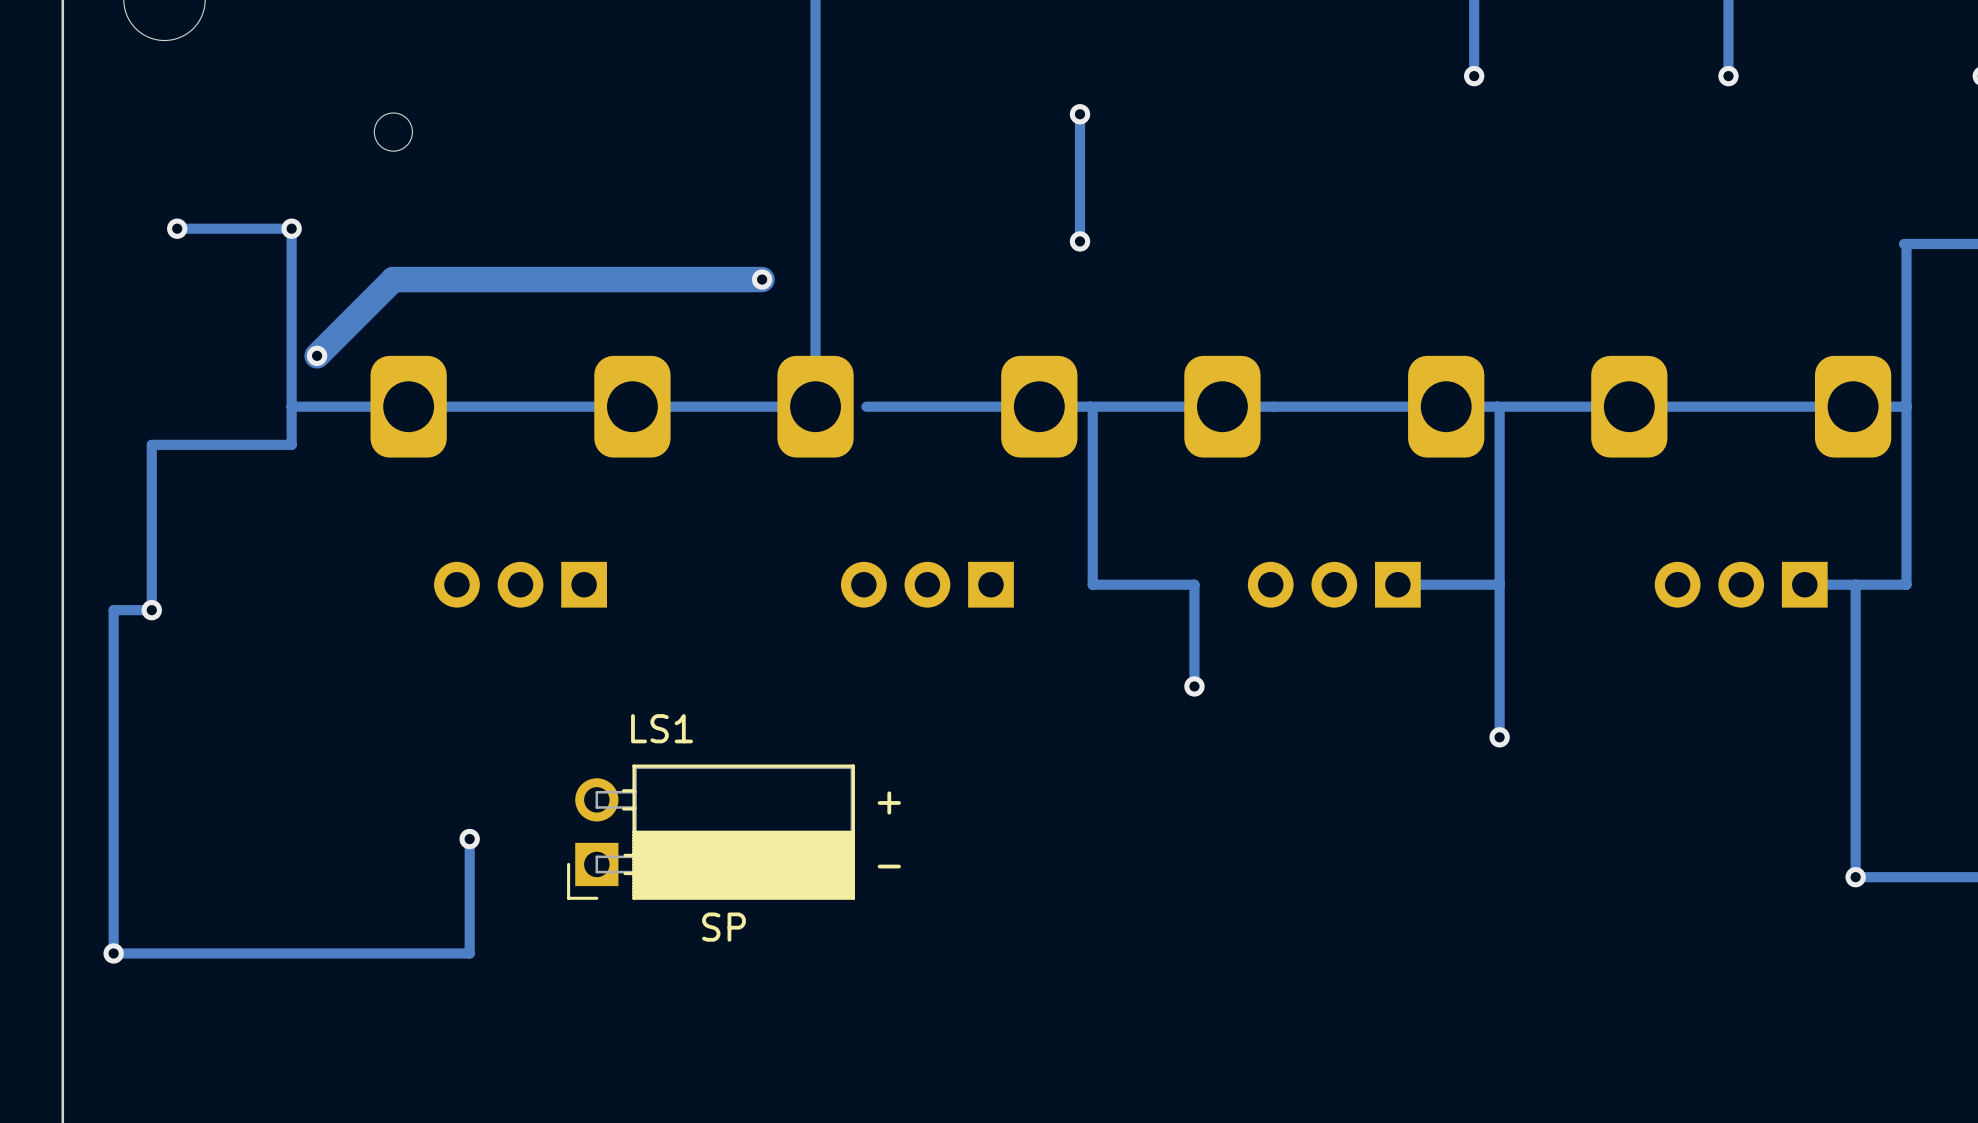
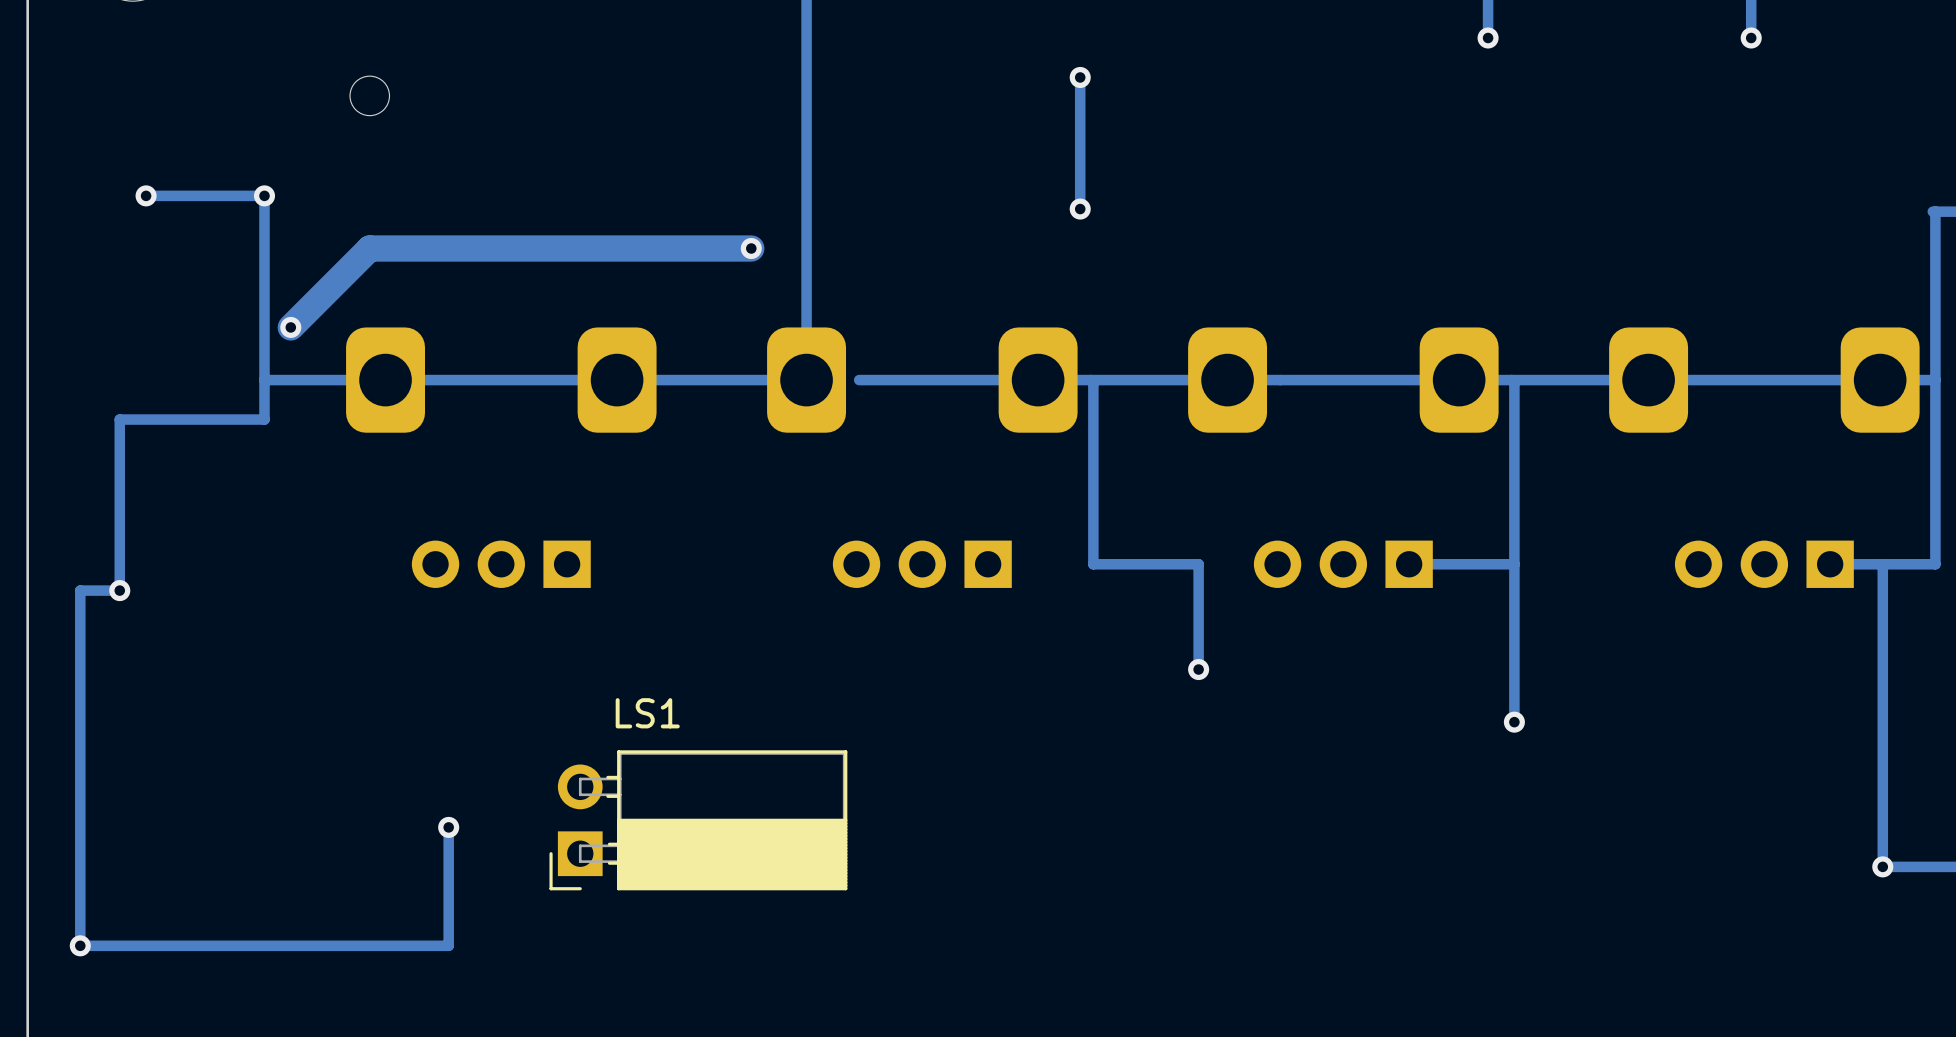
text: + (889, 802) -> none
text: - (889, 866) -> none
text: SP (723, 927) -> none

